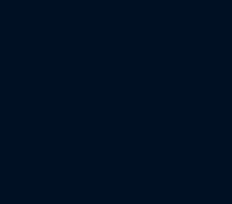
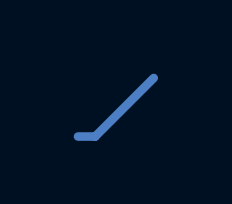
bottom track: none -> (153, 77) (95, 136) (77, 136)

